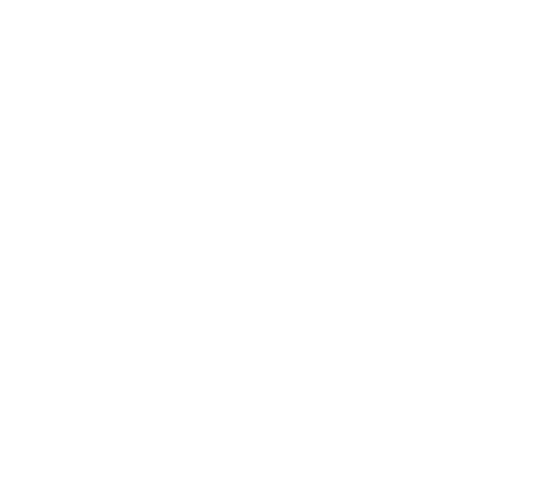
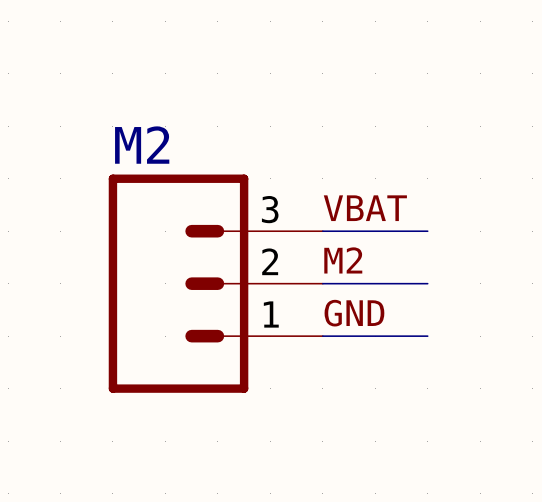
label: none -> VBAT (365, 208)
wire: none -> (322, 231) (427, 231)
label: none -> M2 (343, 260)
M2: none -> (215, 283)
wire: none -> (322, 283) (427, 283)
label: none -> GND (354, 313)
wire: none -> (322, 336) (427, 336)

